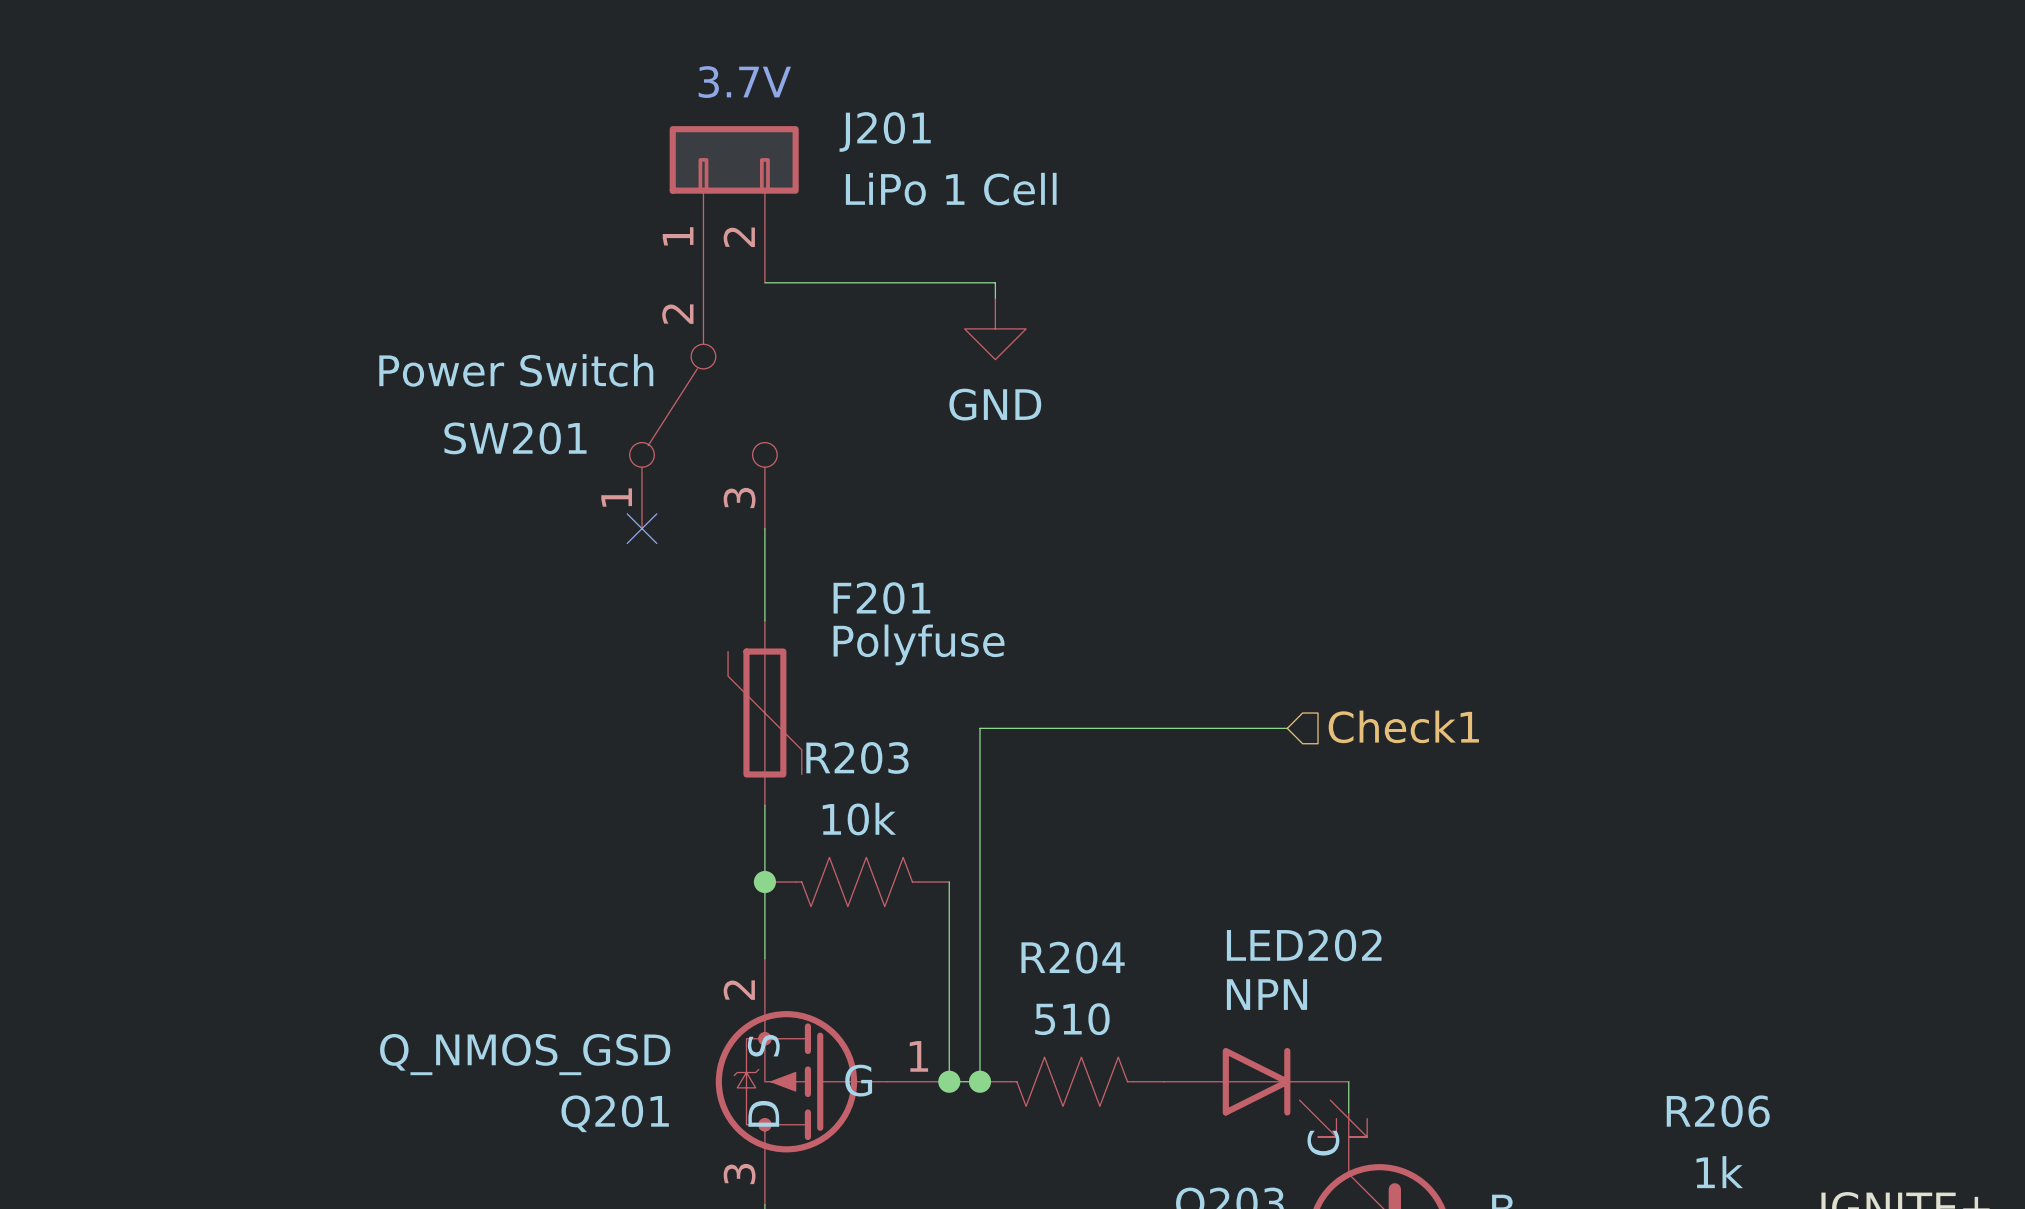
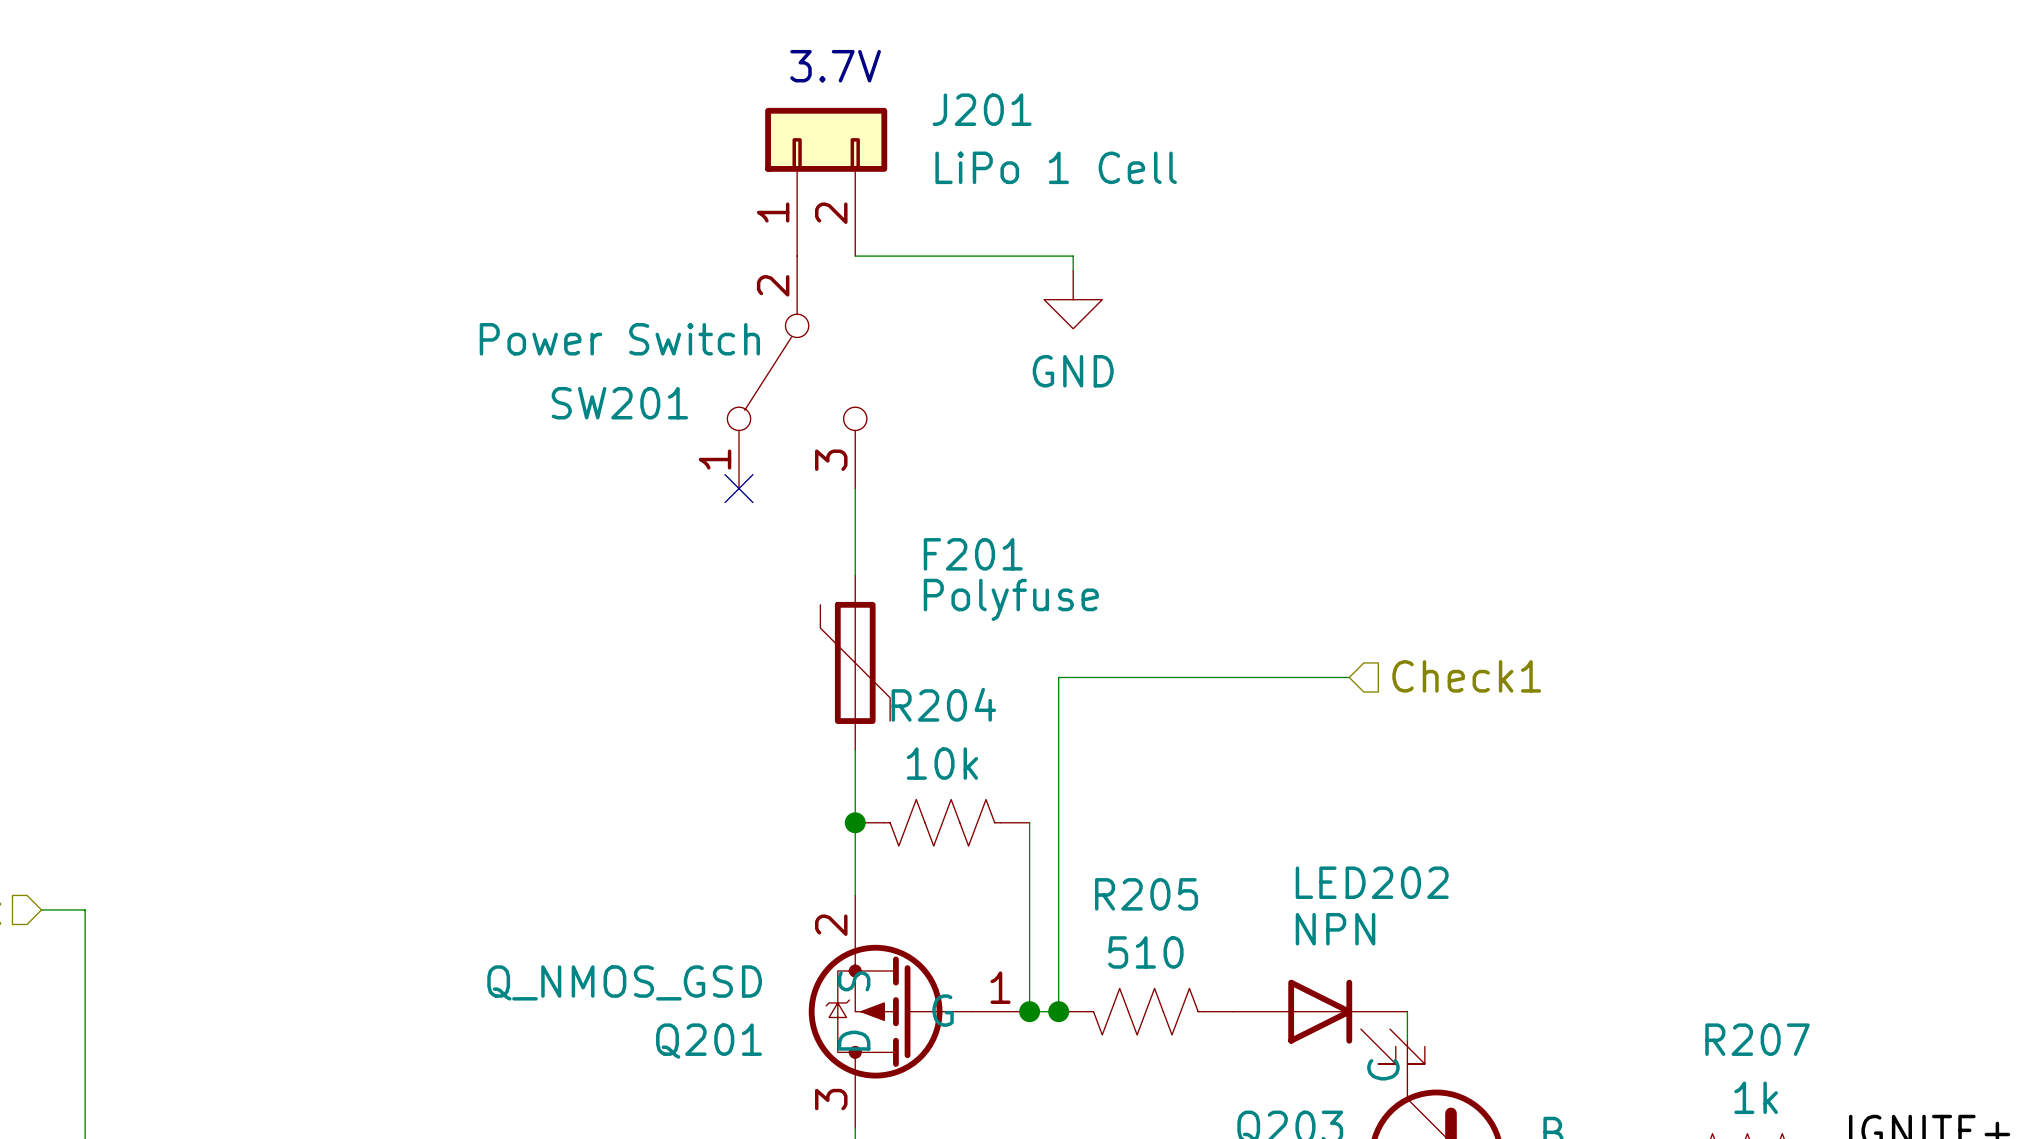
R203 name: R203 (857, 757) -> R204 (943, 704)
R204 name: R204 (1073, 957) -> R205 (1146, 894)
R206 name: R206 (1718, 1111) -> R207 (1757, 1039)

